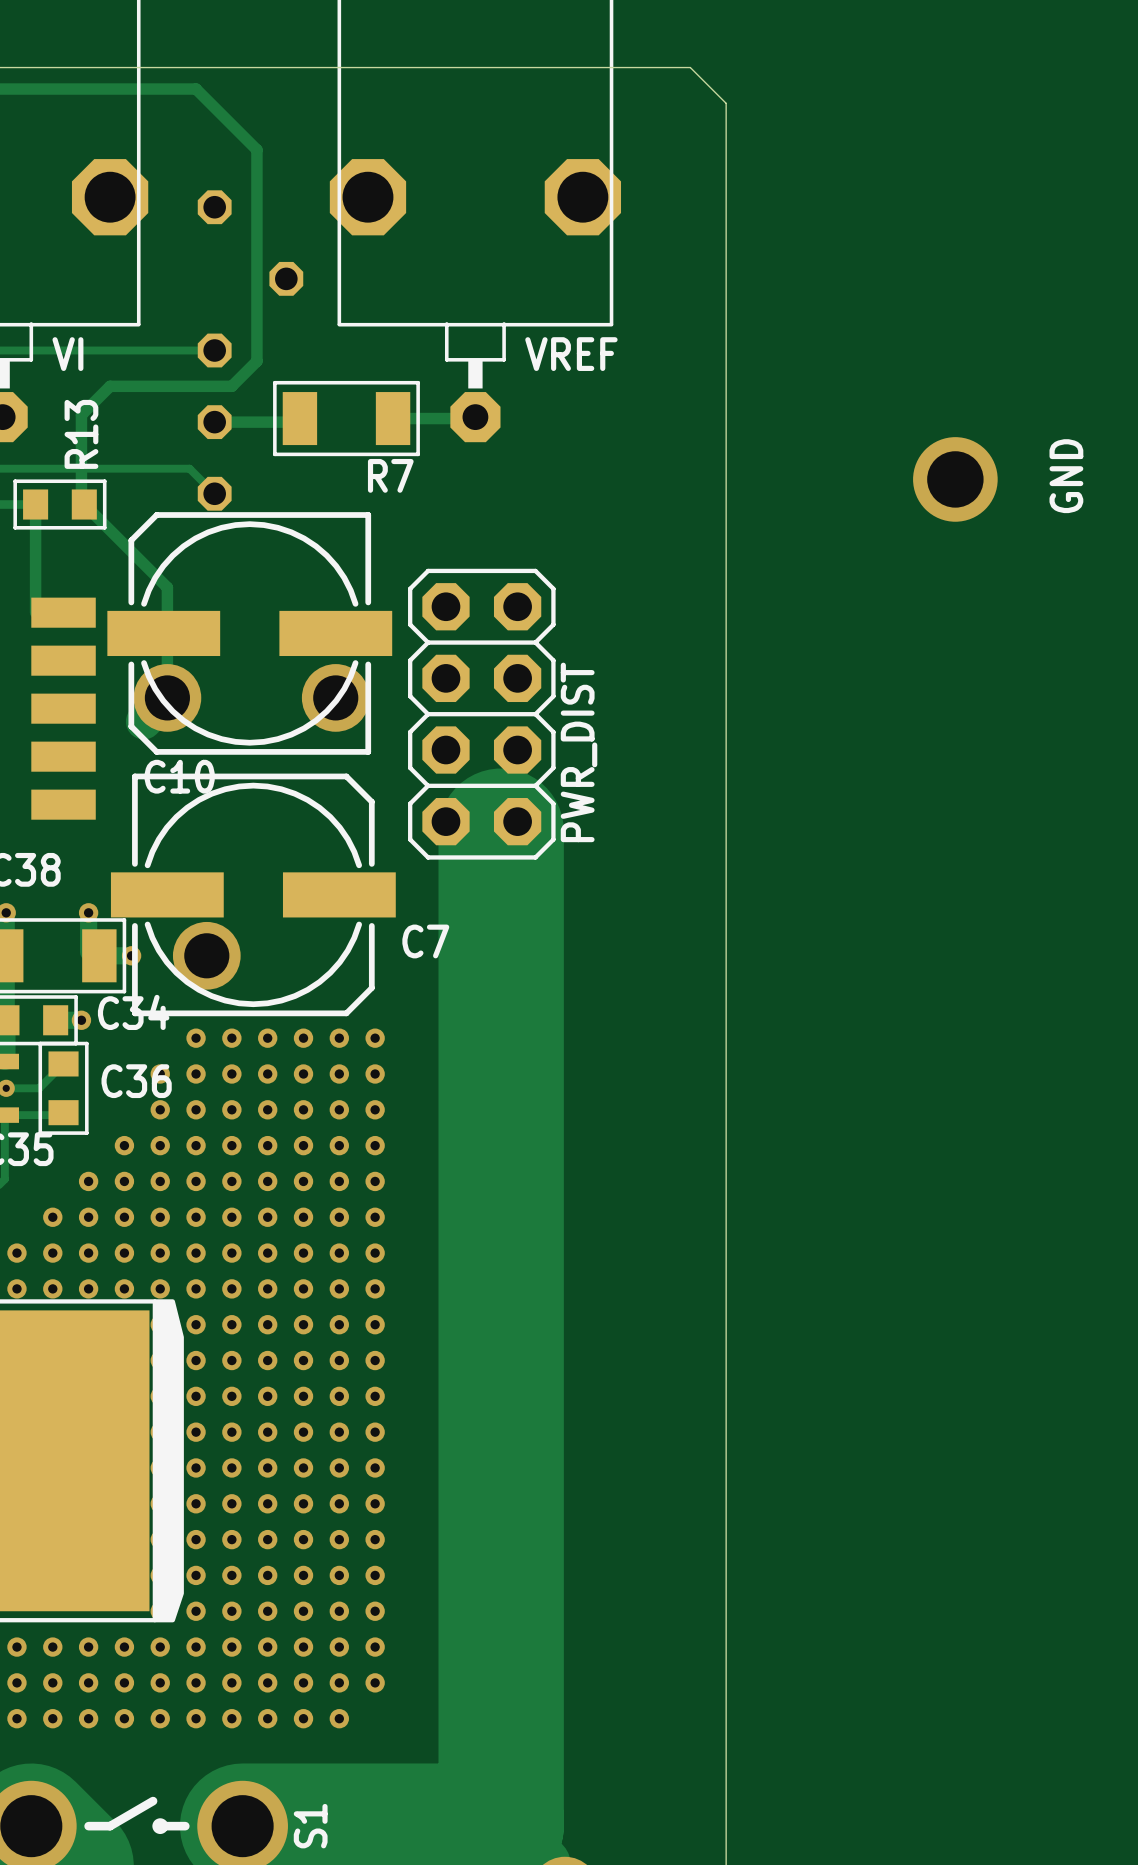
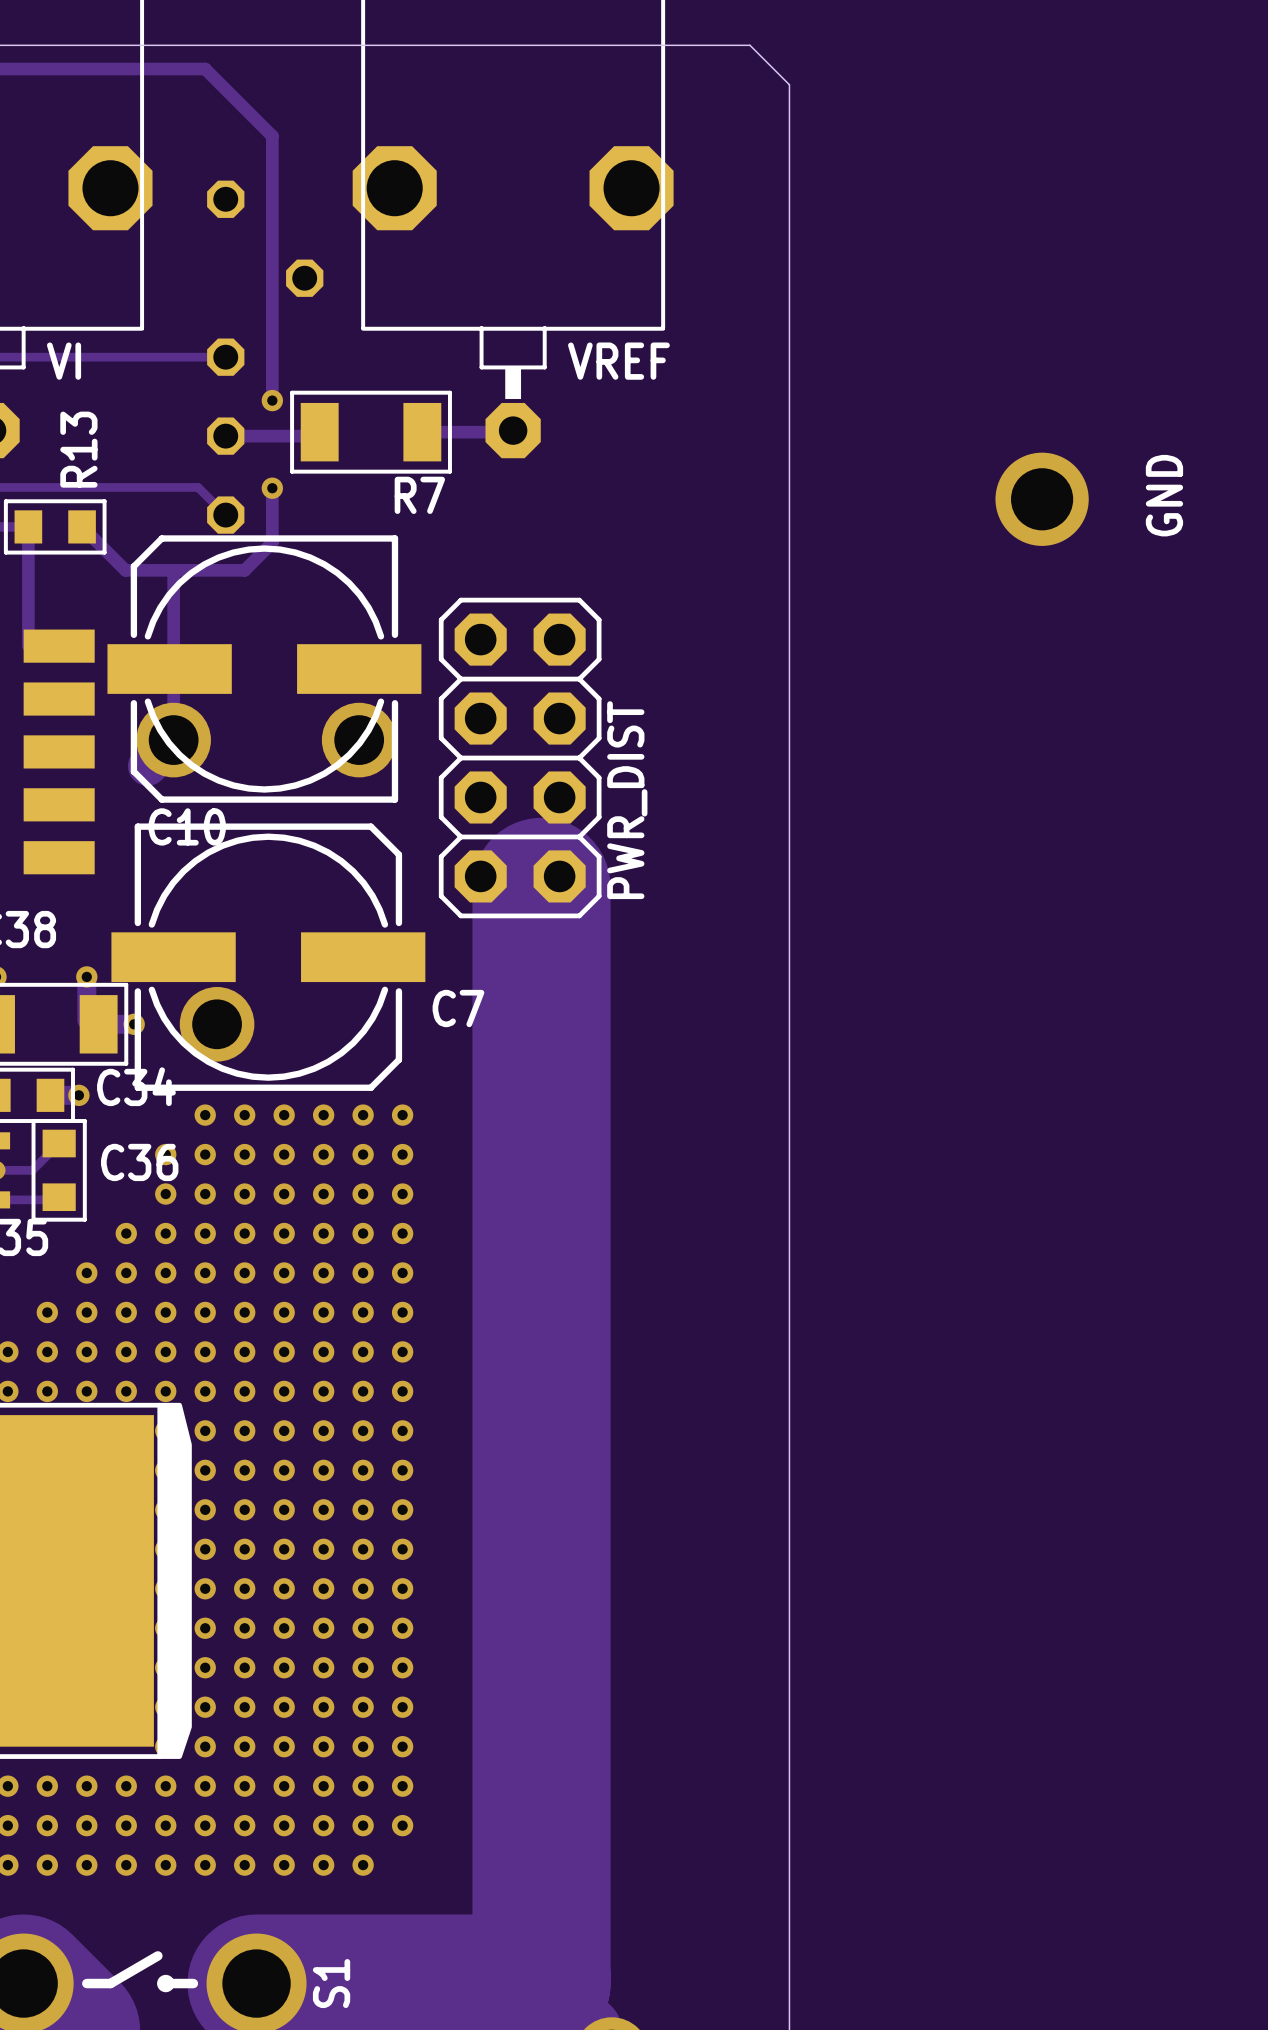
track: (256, 361) (231, 386) (110, 386) (81, 414) (81, 501) (84, 504) -> (272, 369) (272, 400)
via: none -> (272, 400)
track: none -> (272, 488) (272, 542) (244, 570) (125, 570)
via: none -> (272, 488)
track: (123, 543) (167, 587) -> (177, 570) (173, 574) (173, 618)

